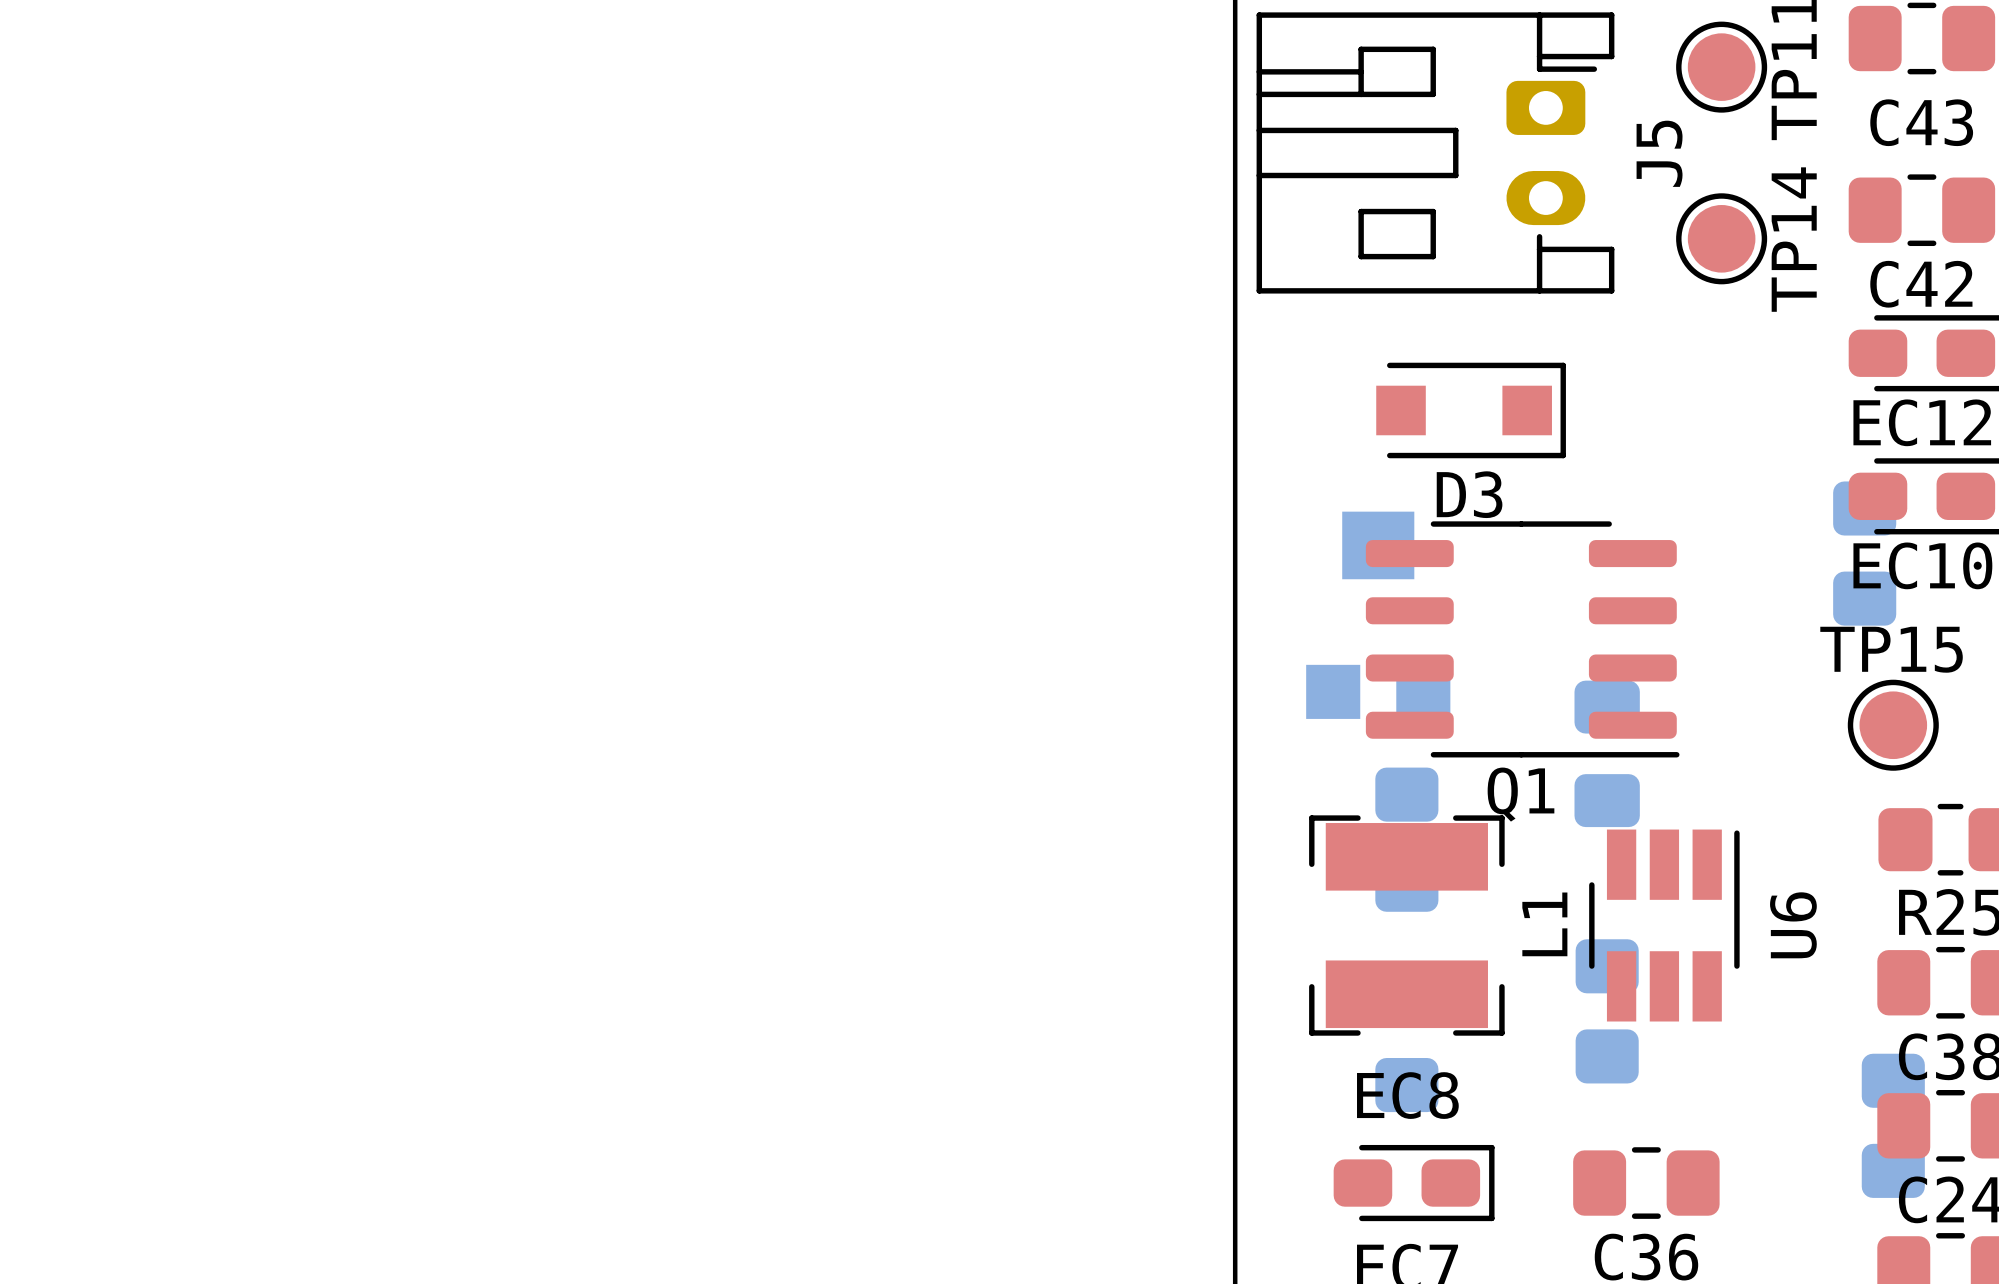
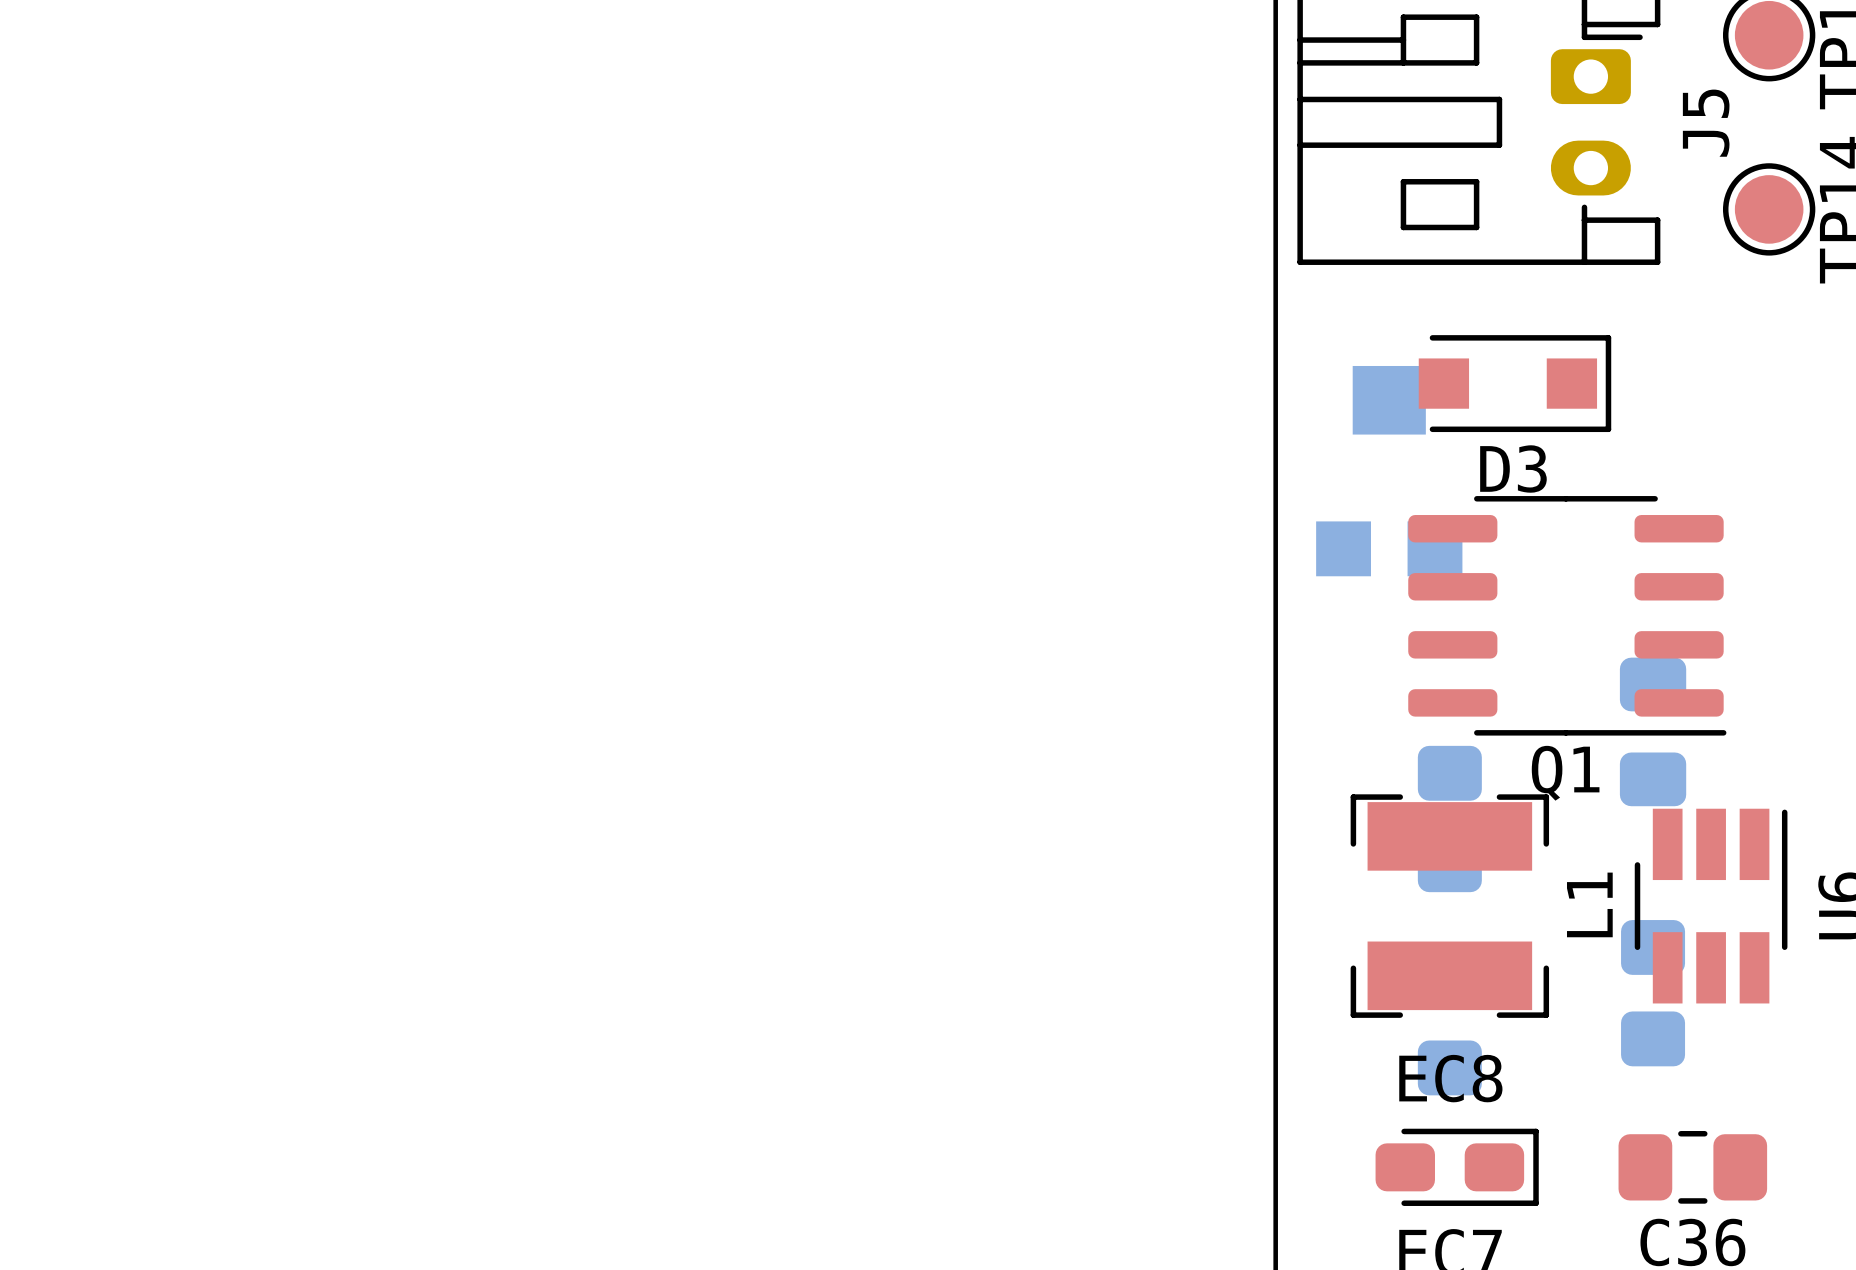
part position: (1378, 615) -> (1389, 471)

